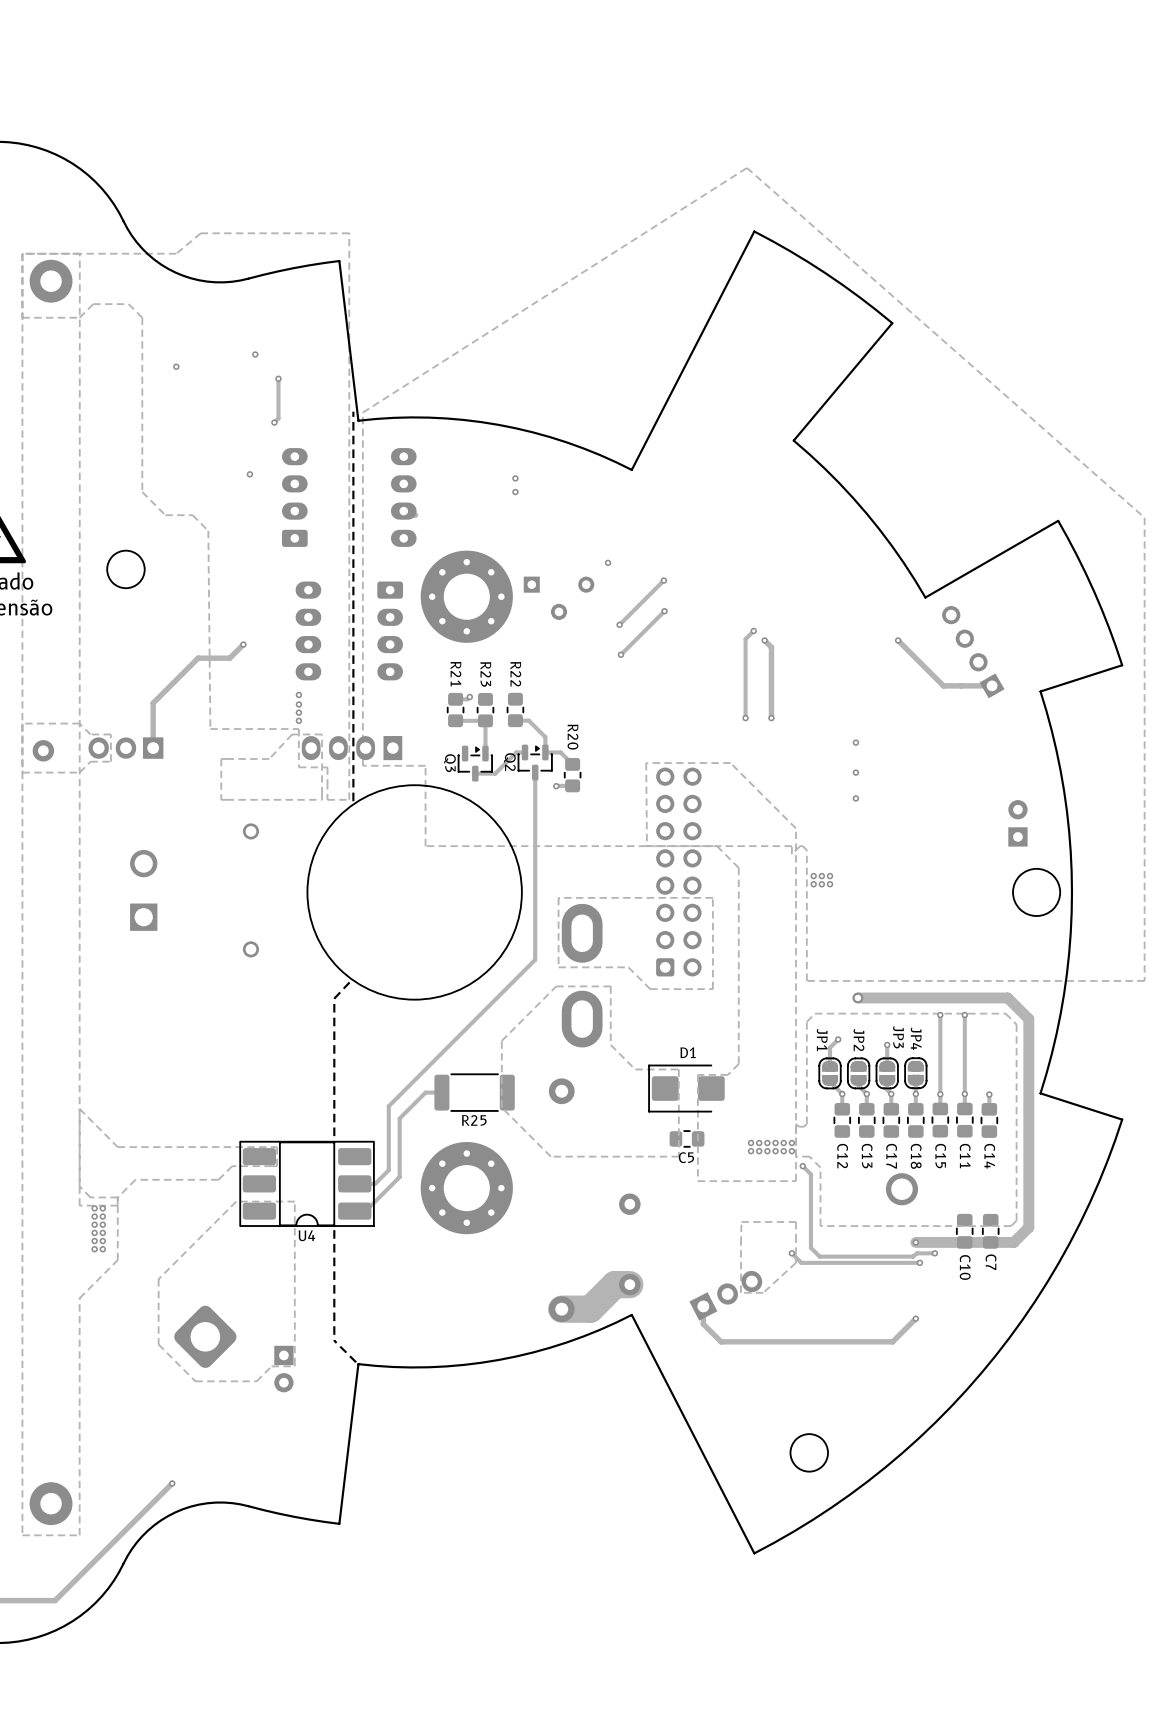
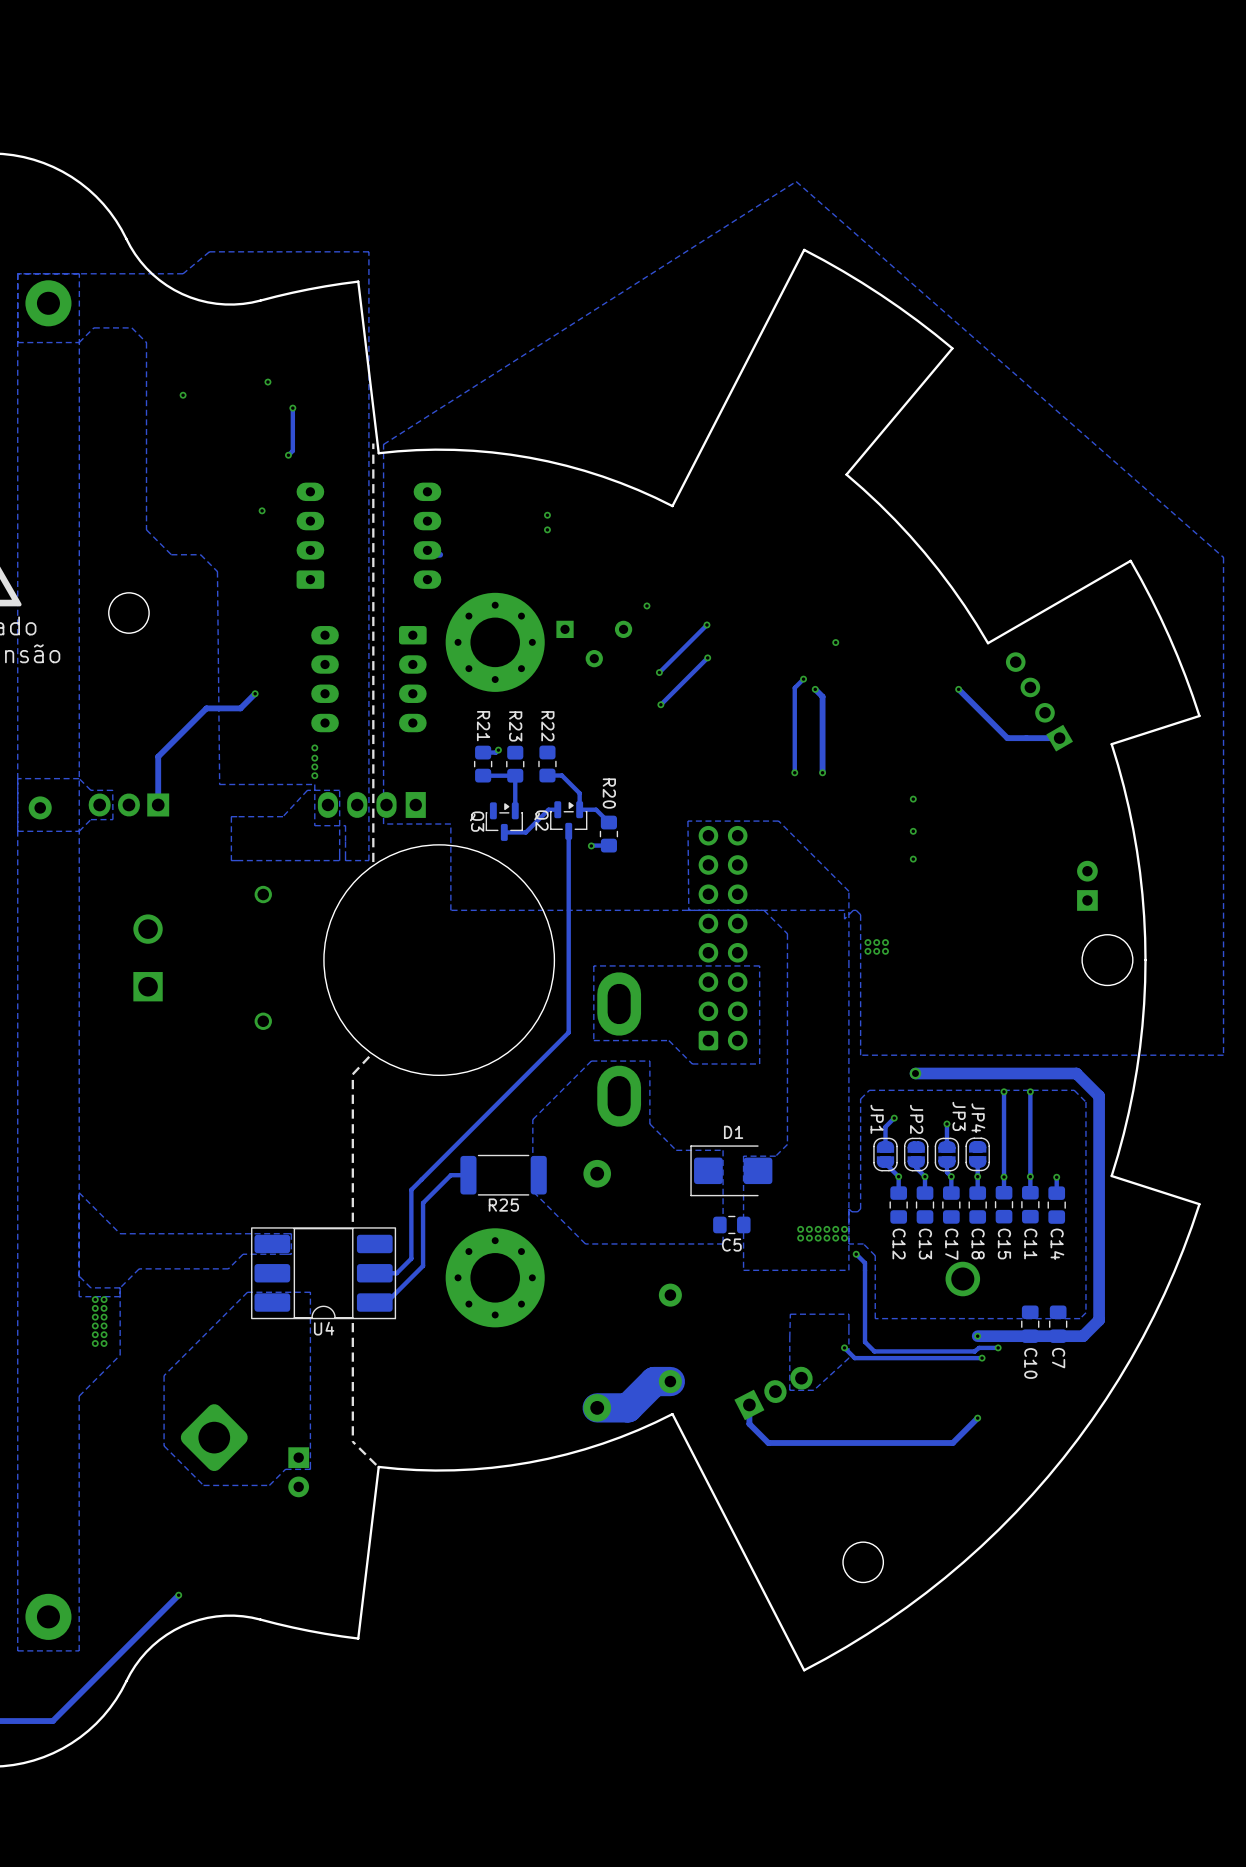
via: none -> (835, 642)

